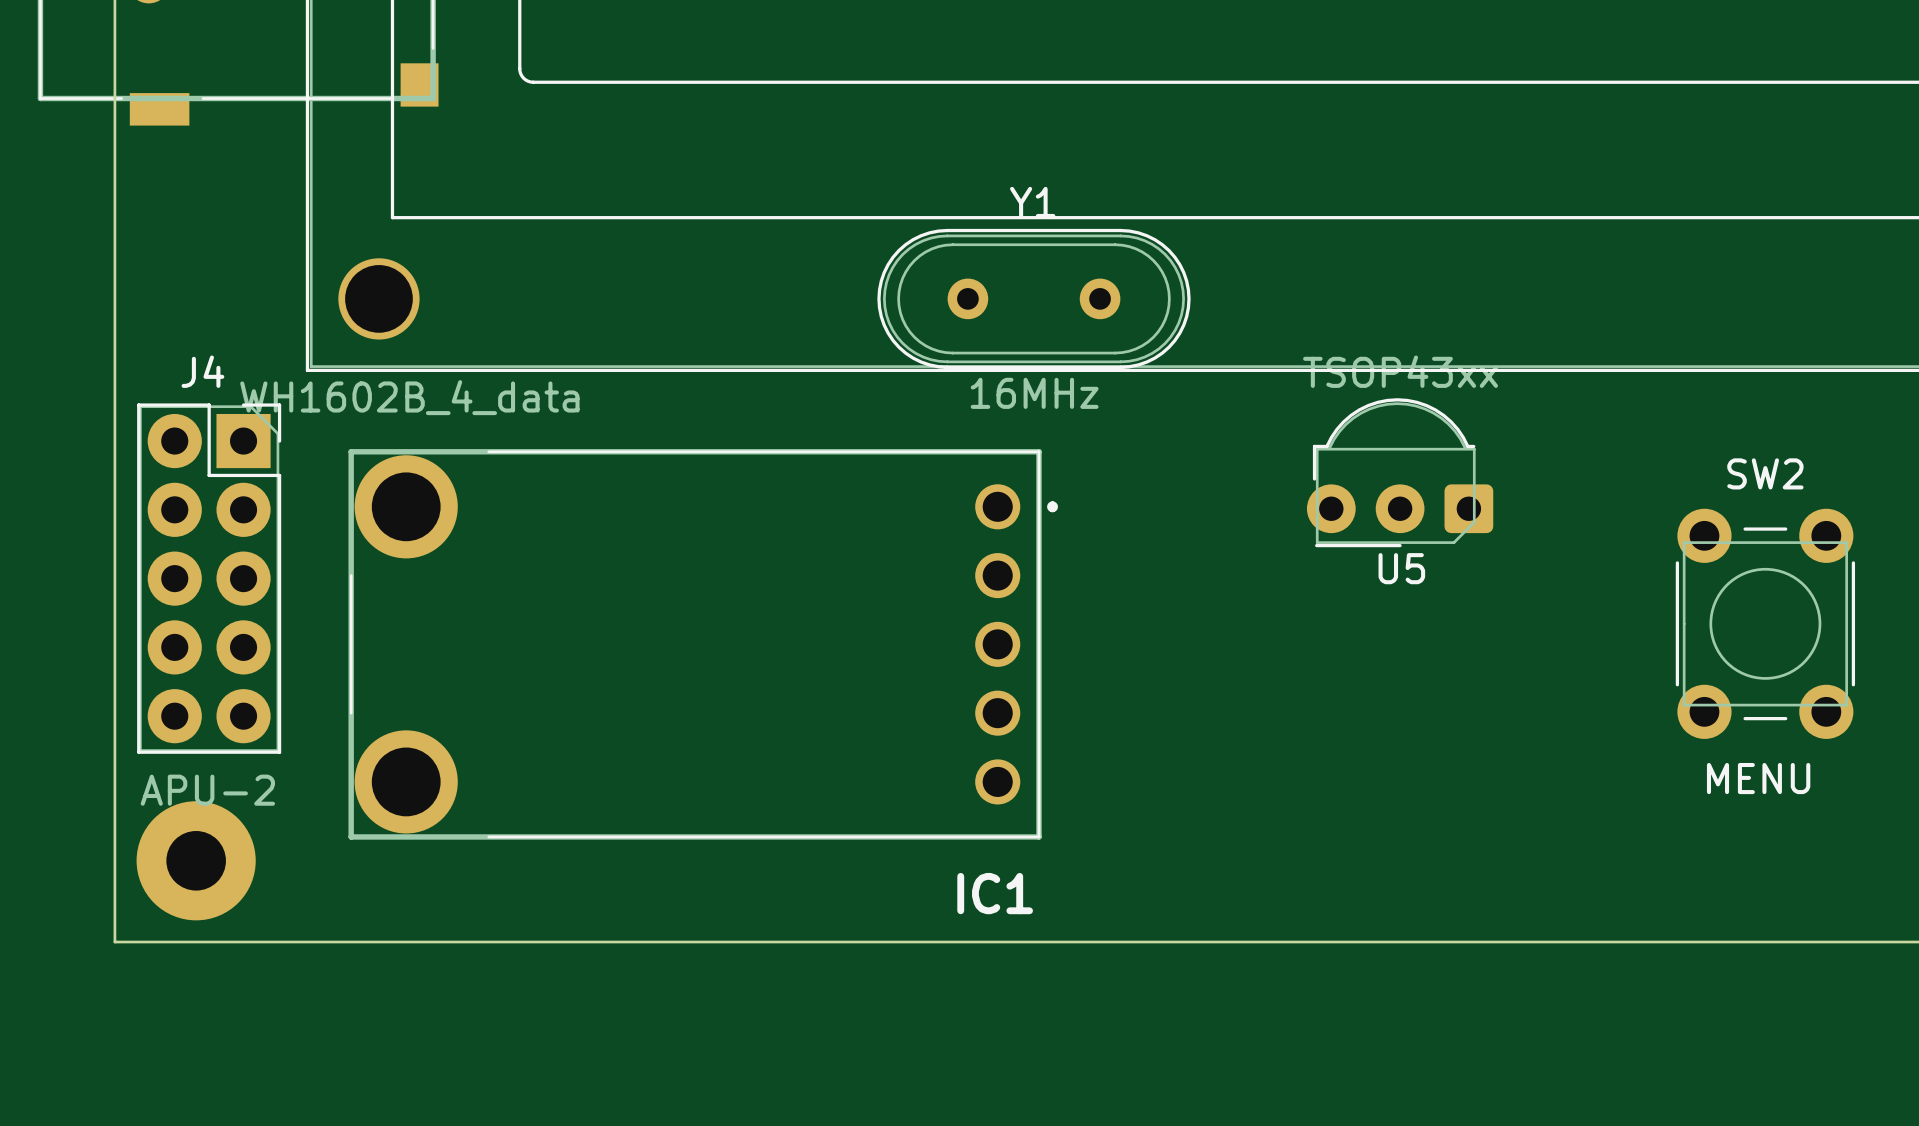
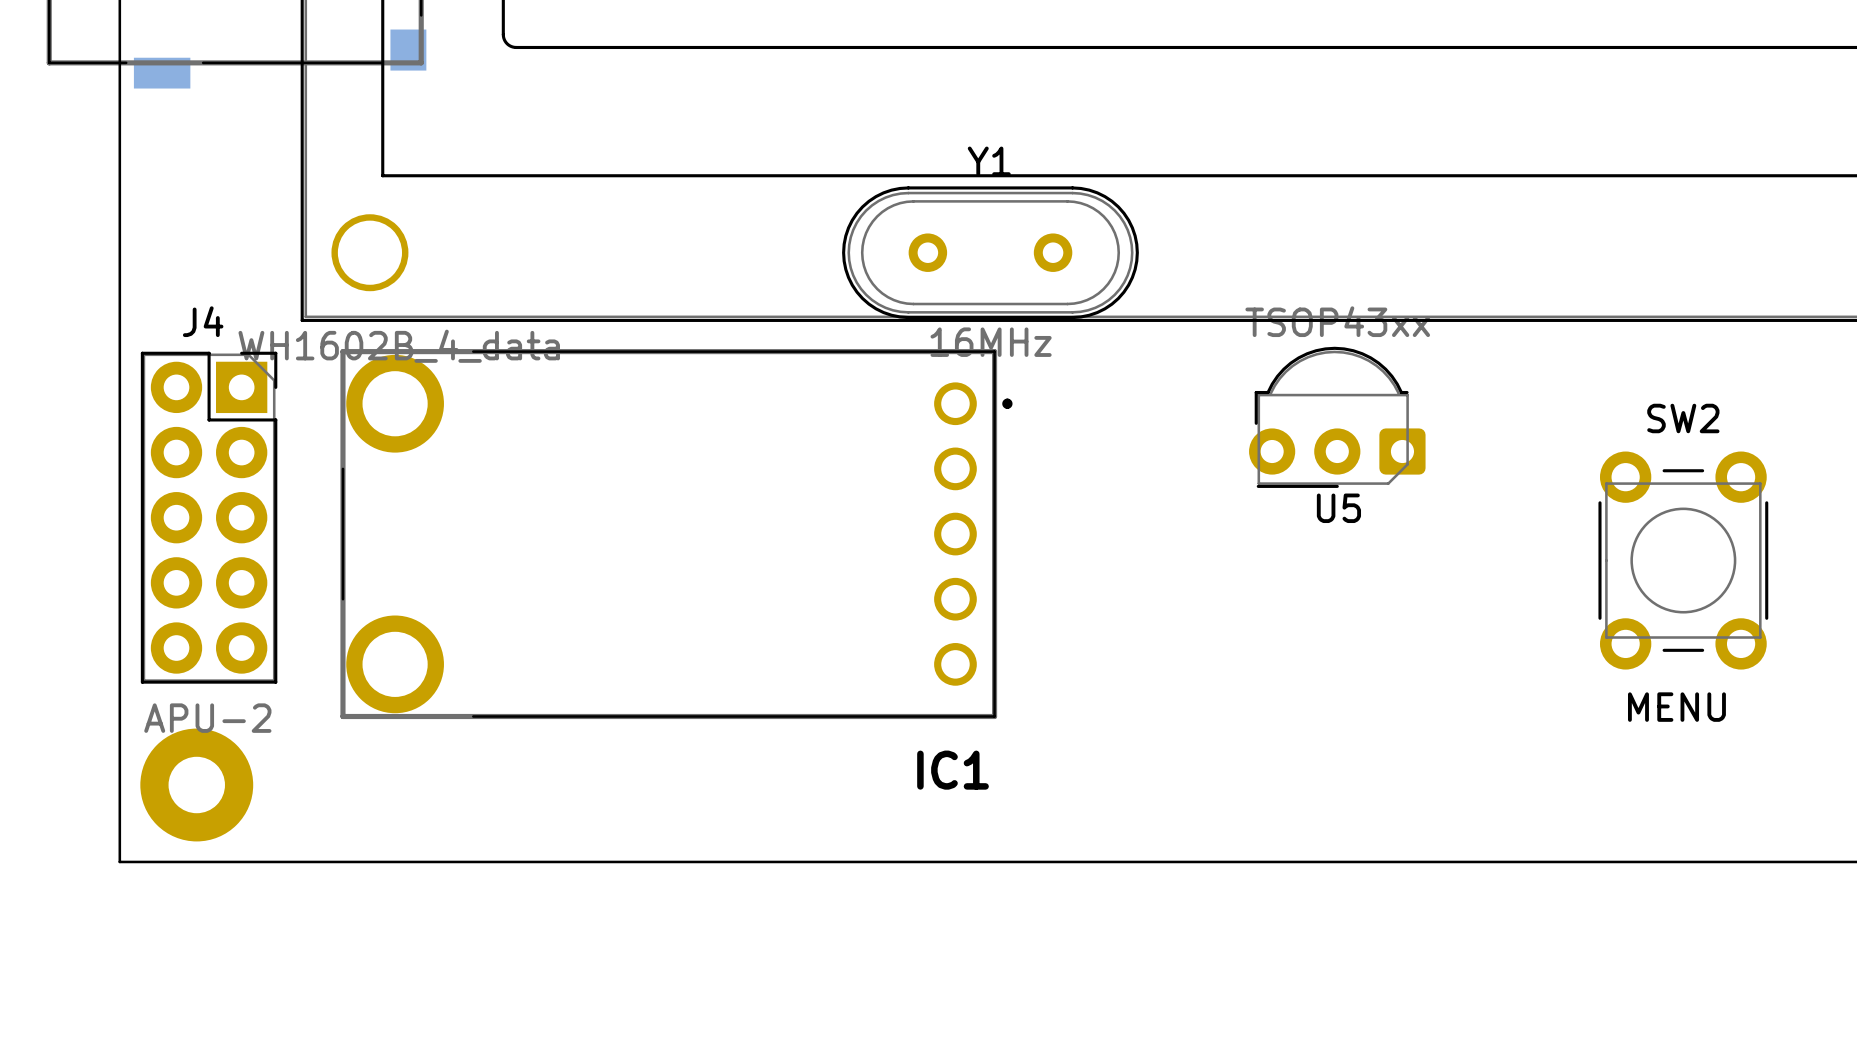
IC1 position: (703, 644) -> (676, 534)

